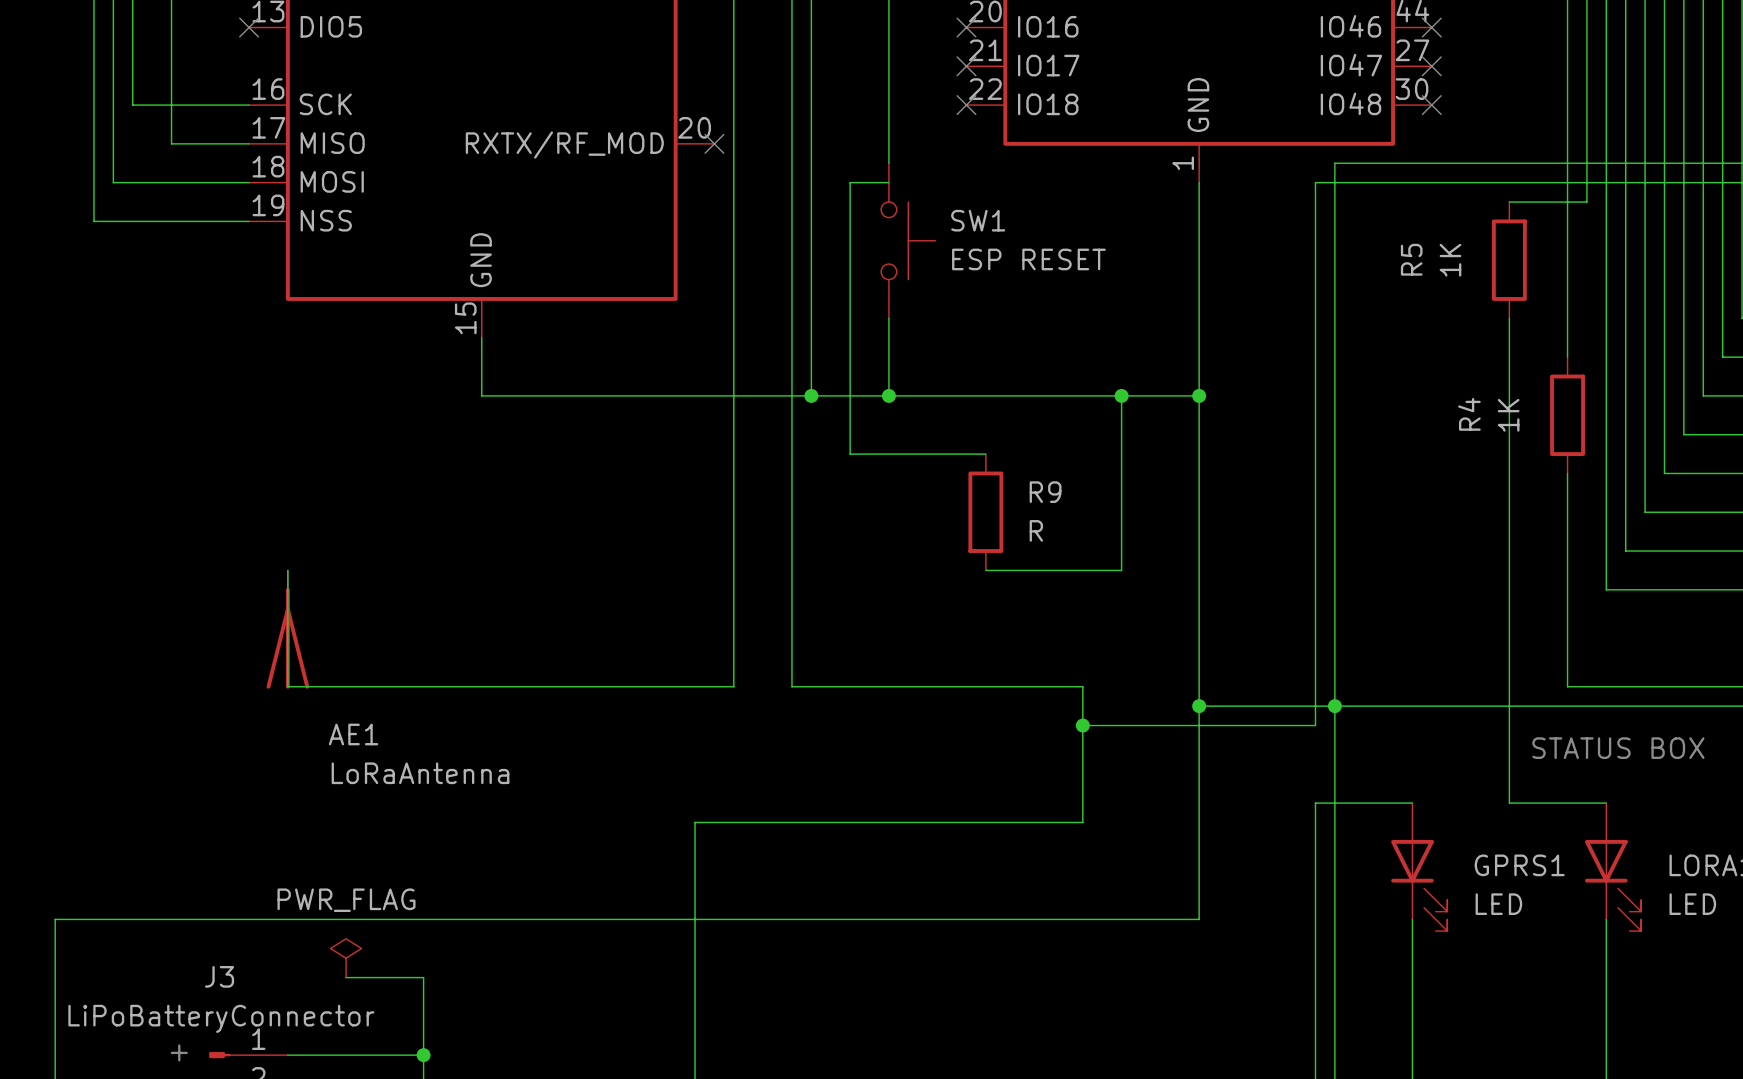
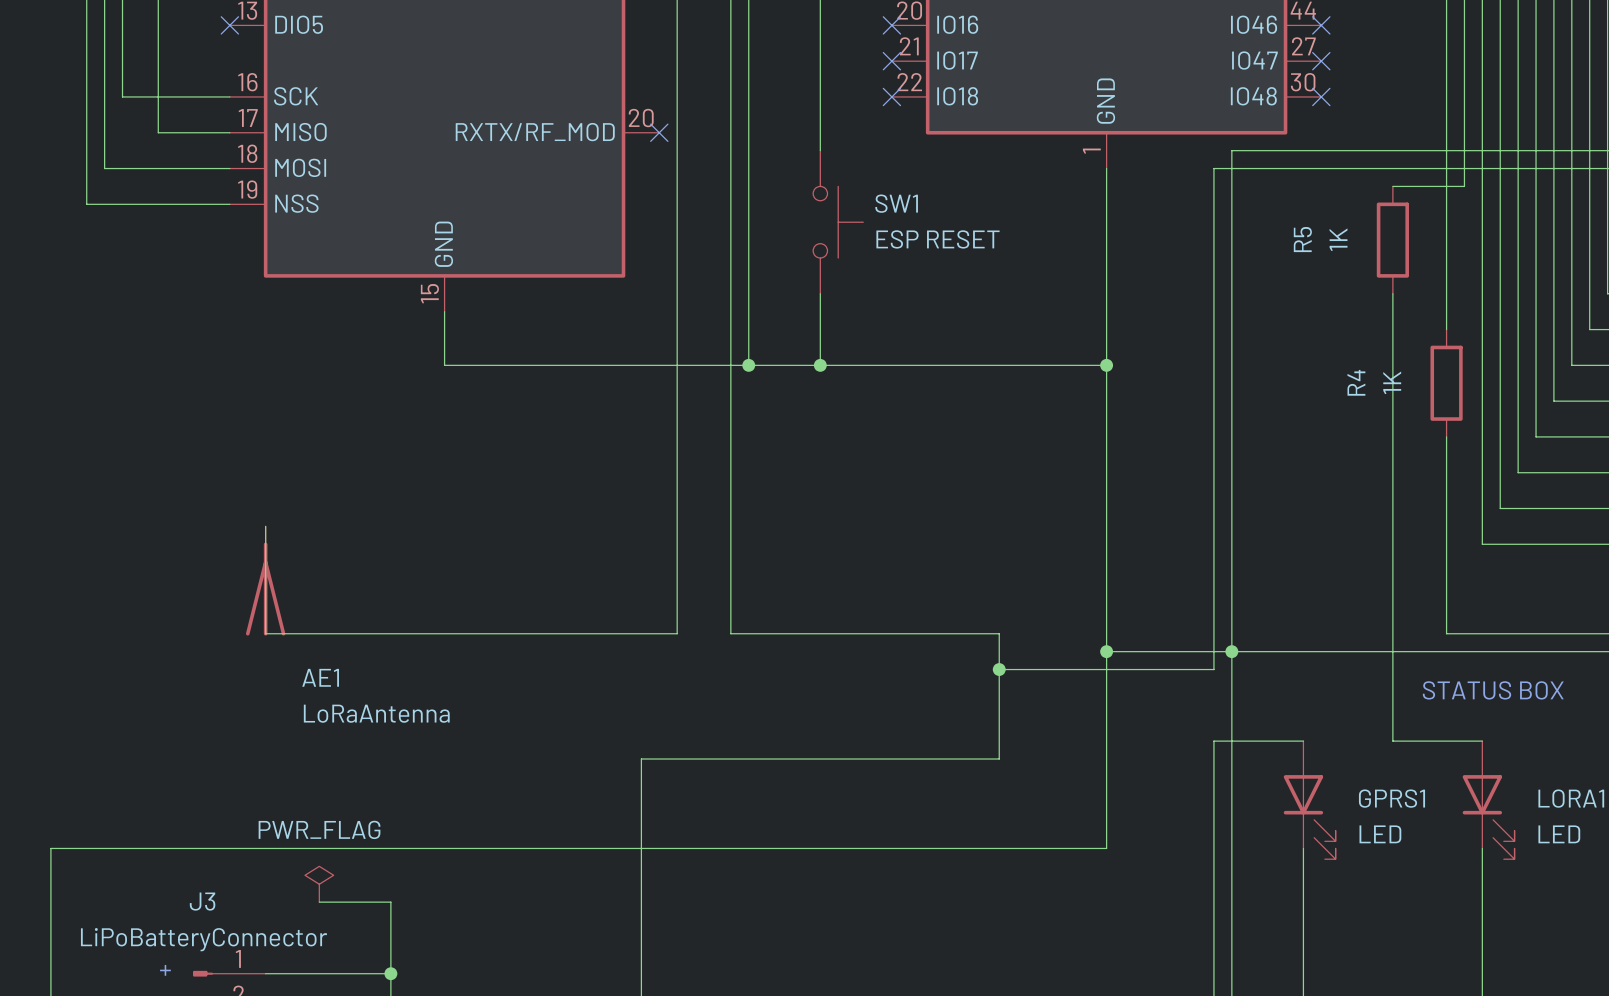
wire: (888, 182) (850, 182) (850, 454) (985, 454) -> none
wire: (1121, 395) (1121, 570) (985, 570) -> none
junction: (1121, 395) -> none
R9: R (985, 512) -> none

